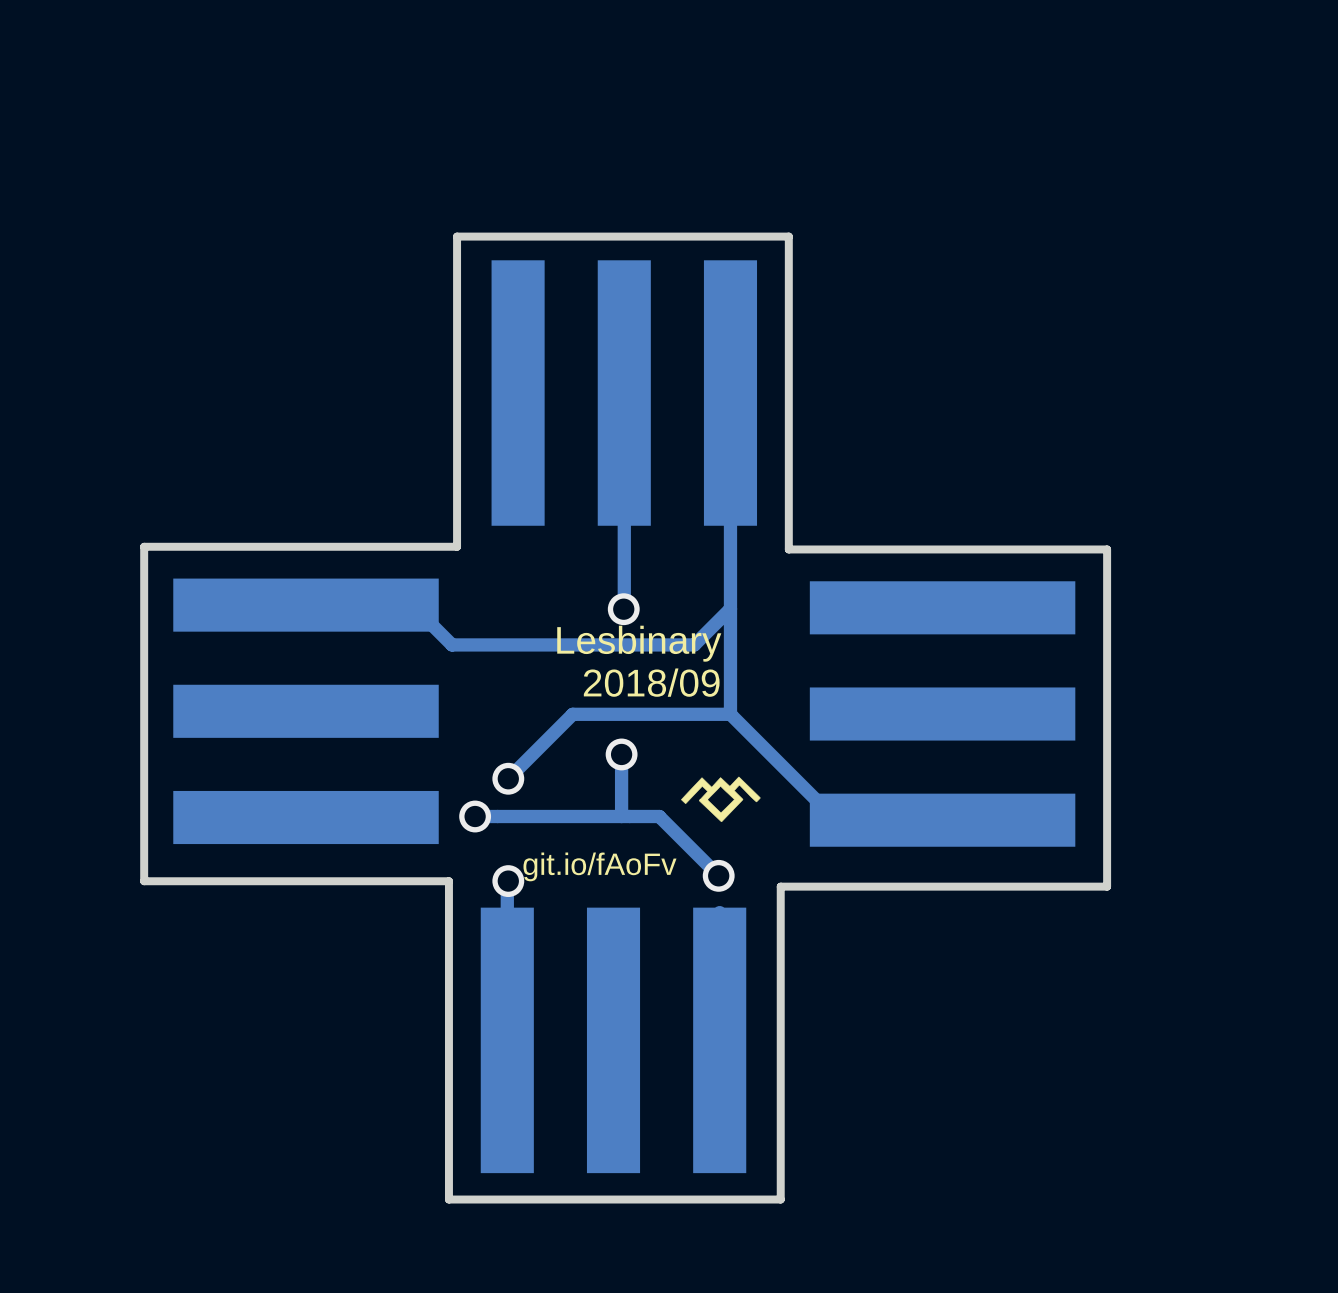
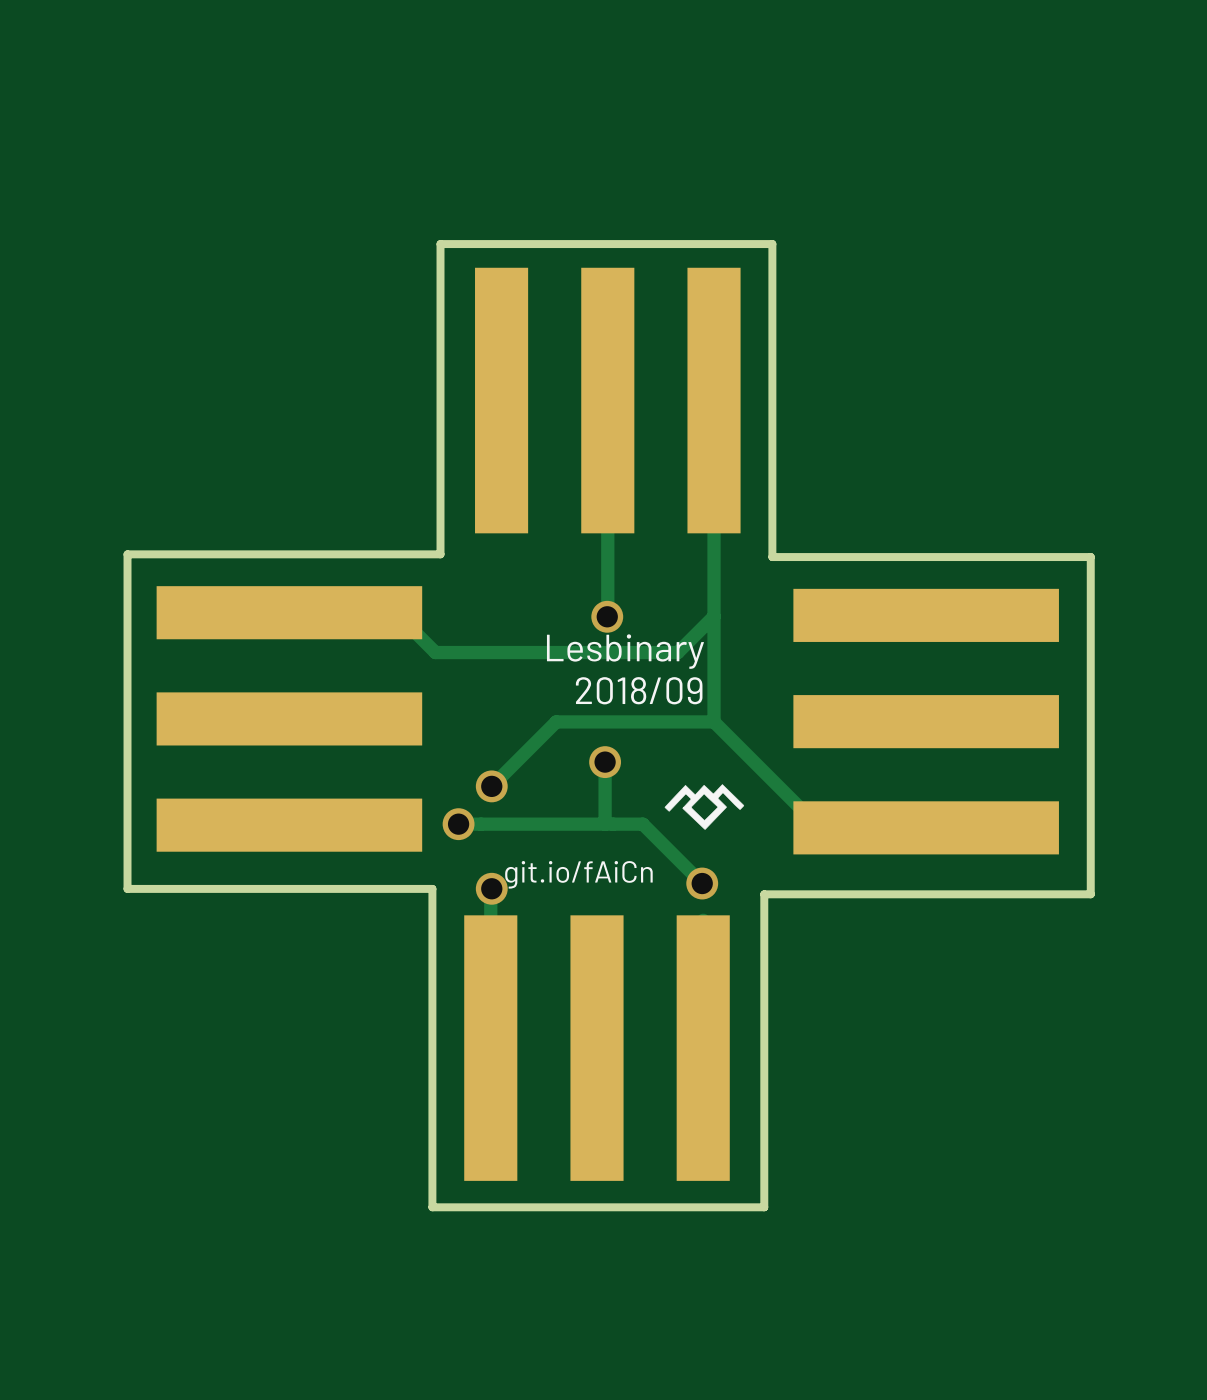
text: git.io/fAoFv (599, 866) -> git.io/fAiCn (578, 874)

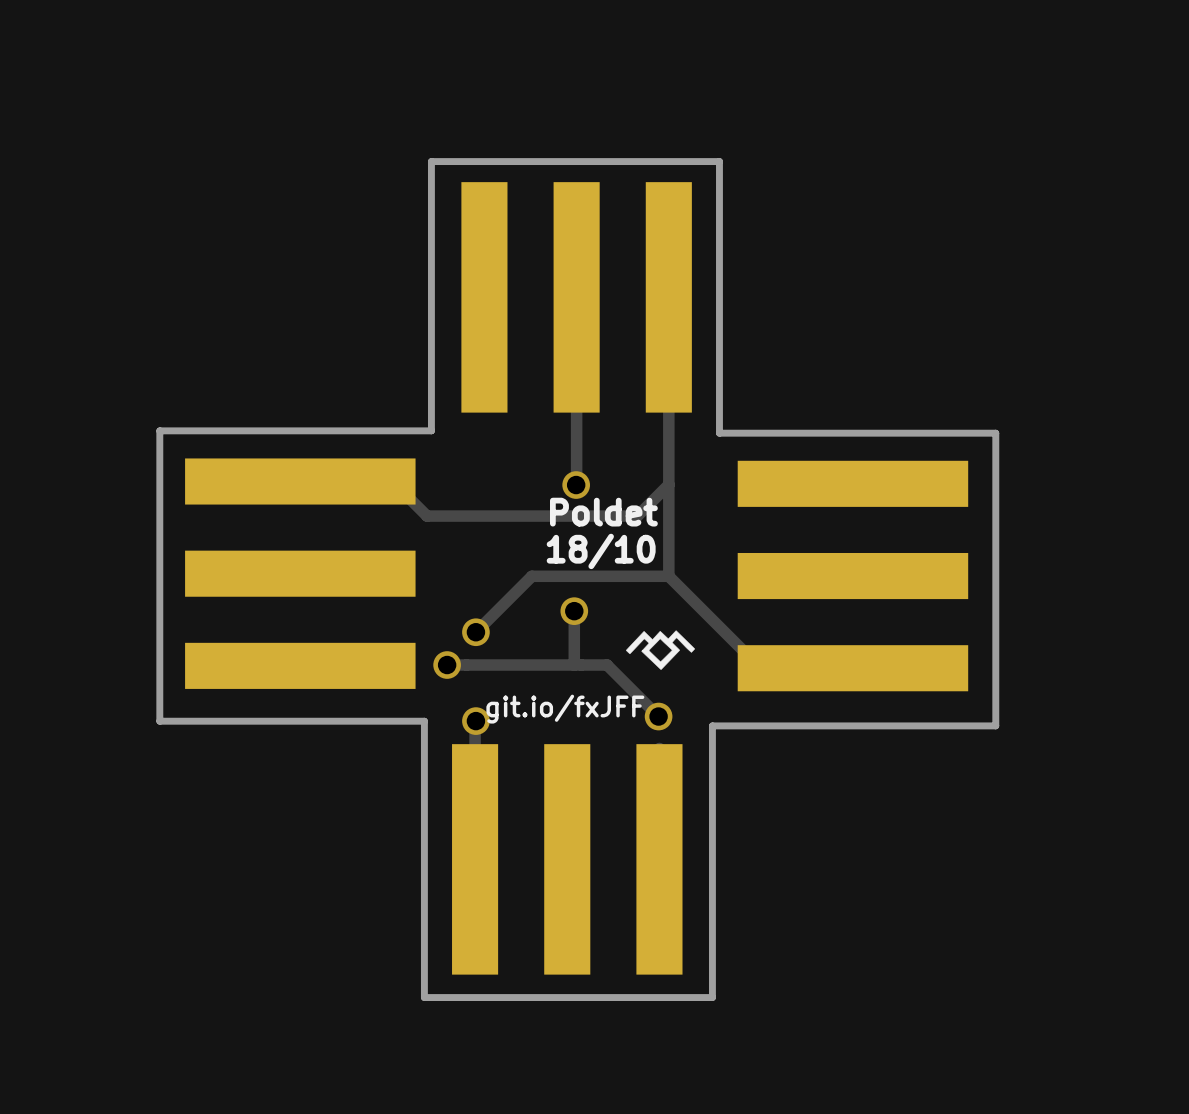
text: Lesbinary (625, 651) -> Poldet (603, 512)
text: 2018/09 (639, 690) -> 18/10 (601, 551)
text: git.io/fAiCn (578, 874) -> git.io/fxJFF (565, 709)

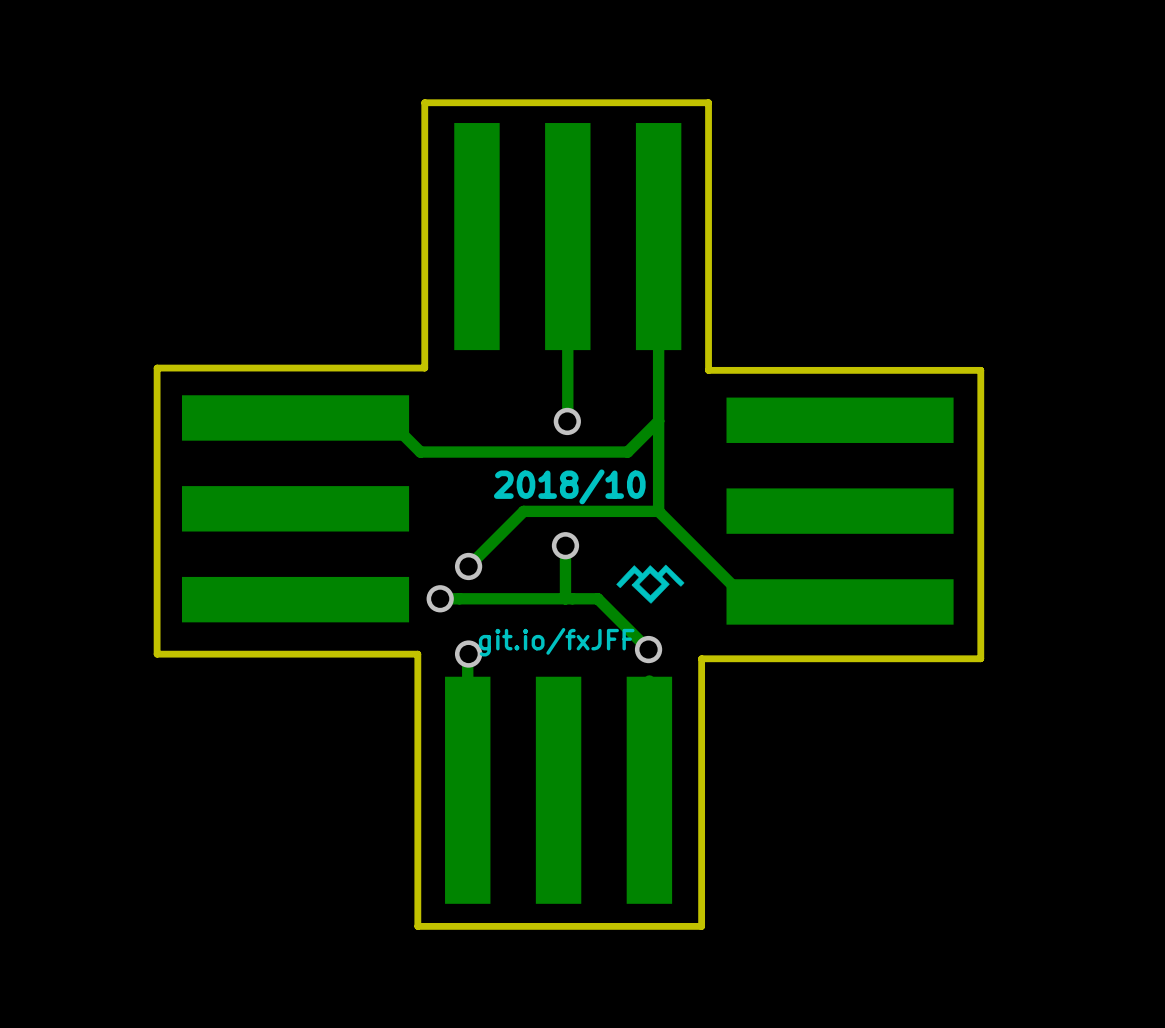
text: Poldet (603, 512) -> none
text: 18/10 (601, 551) -> 2018/10 (569, 486)

